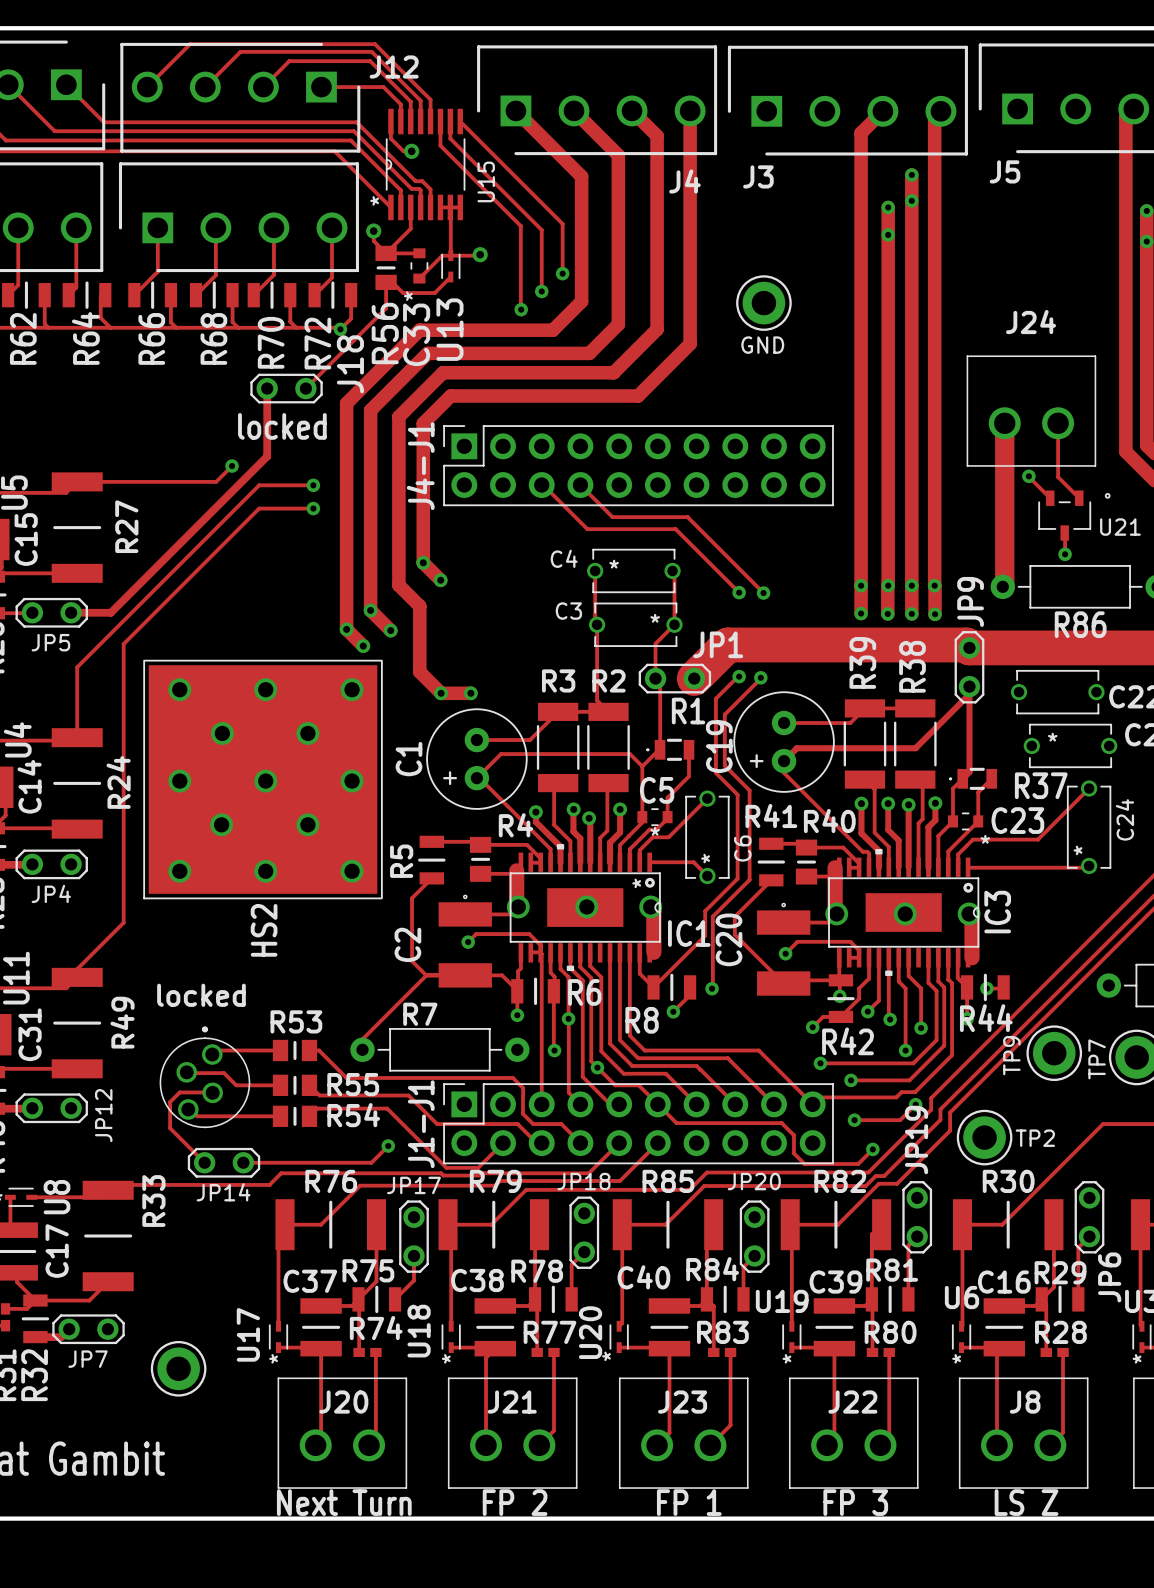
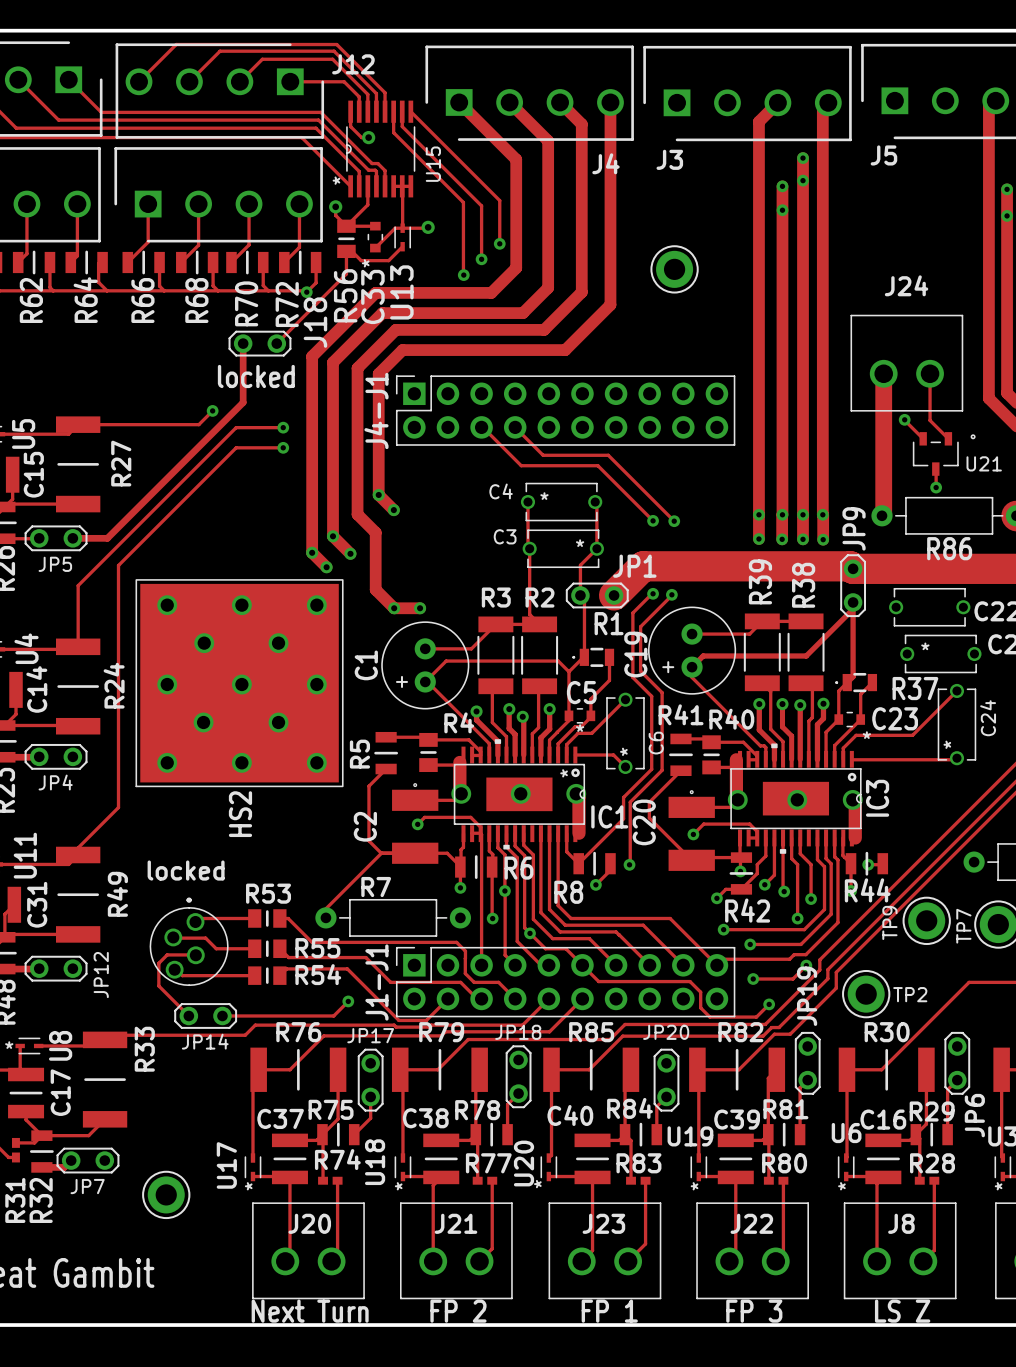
part value: GND (762, 345) -> none

